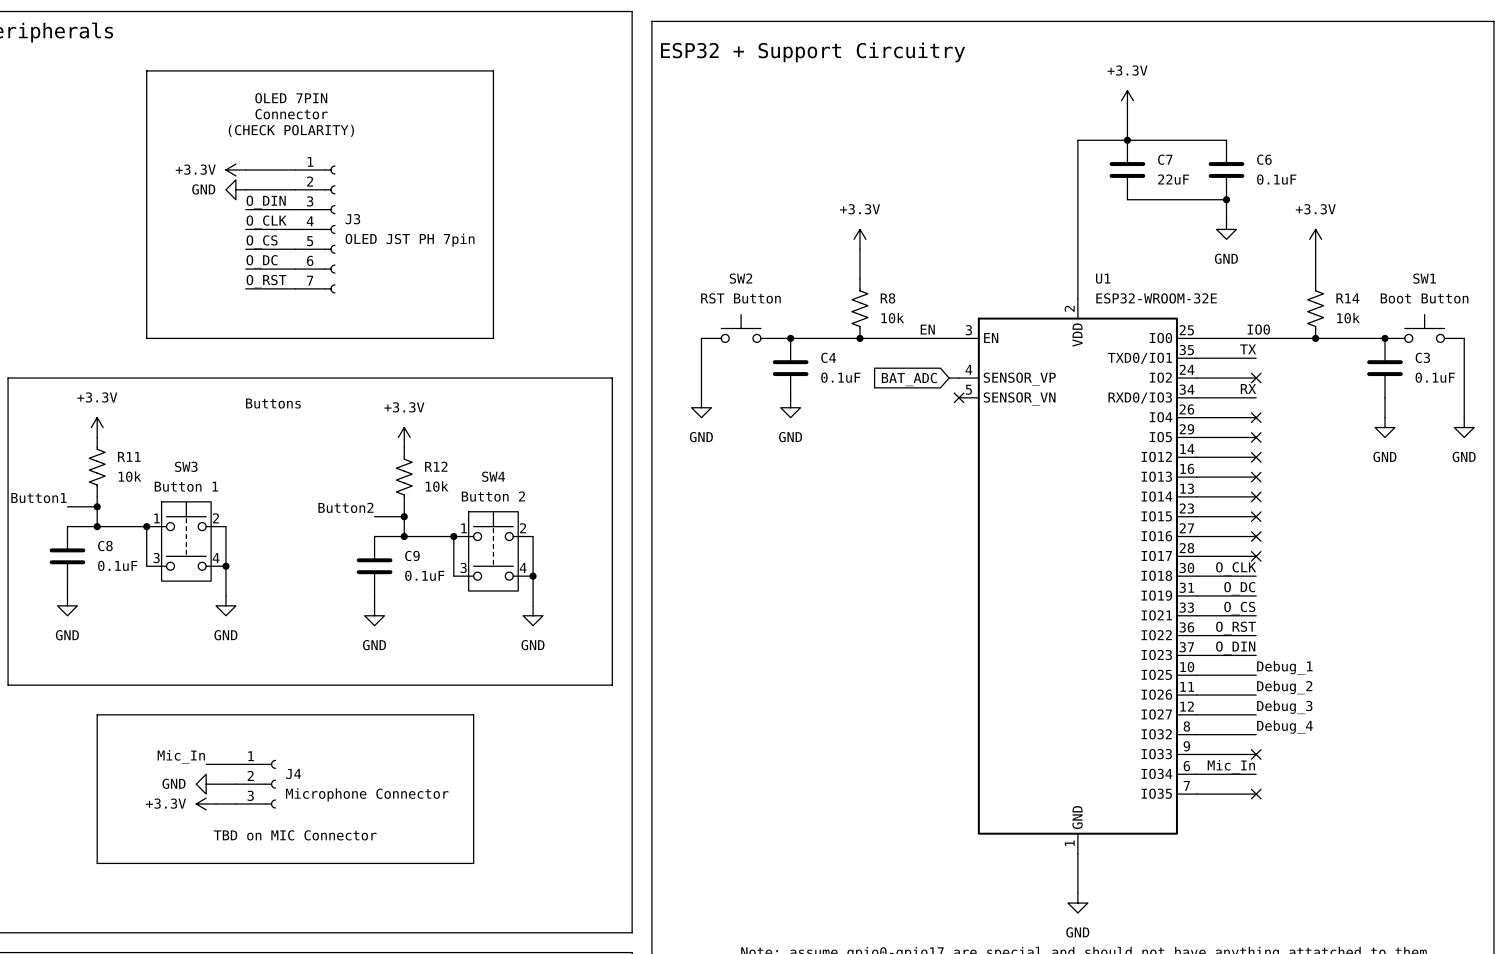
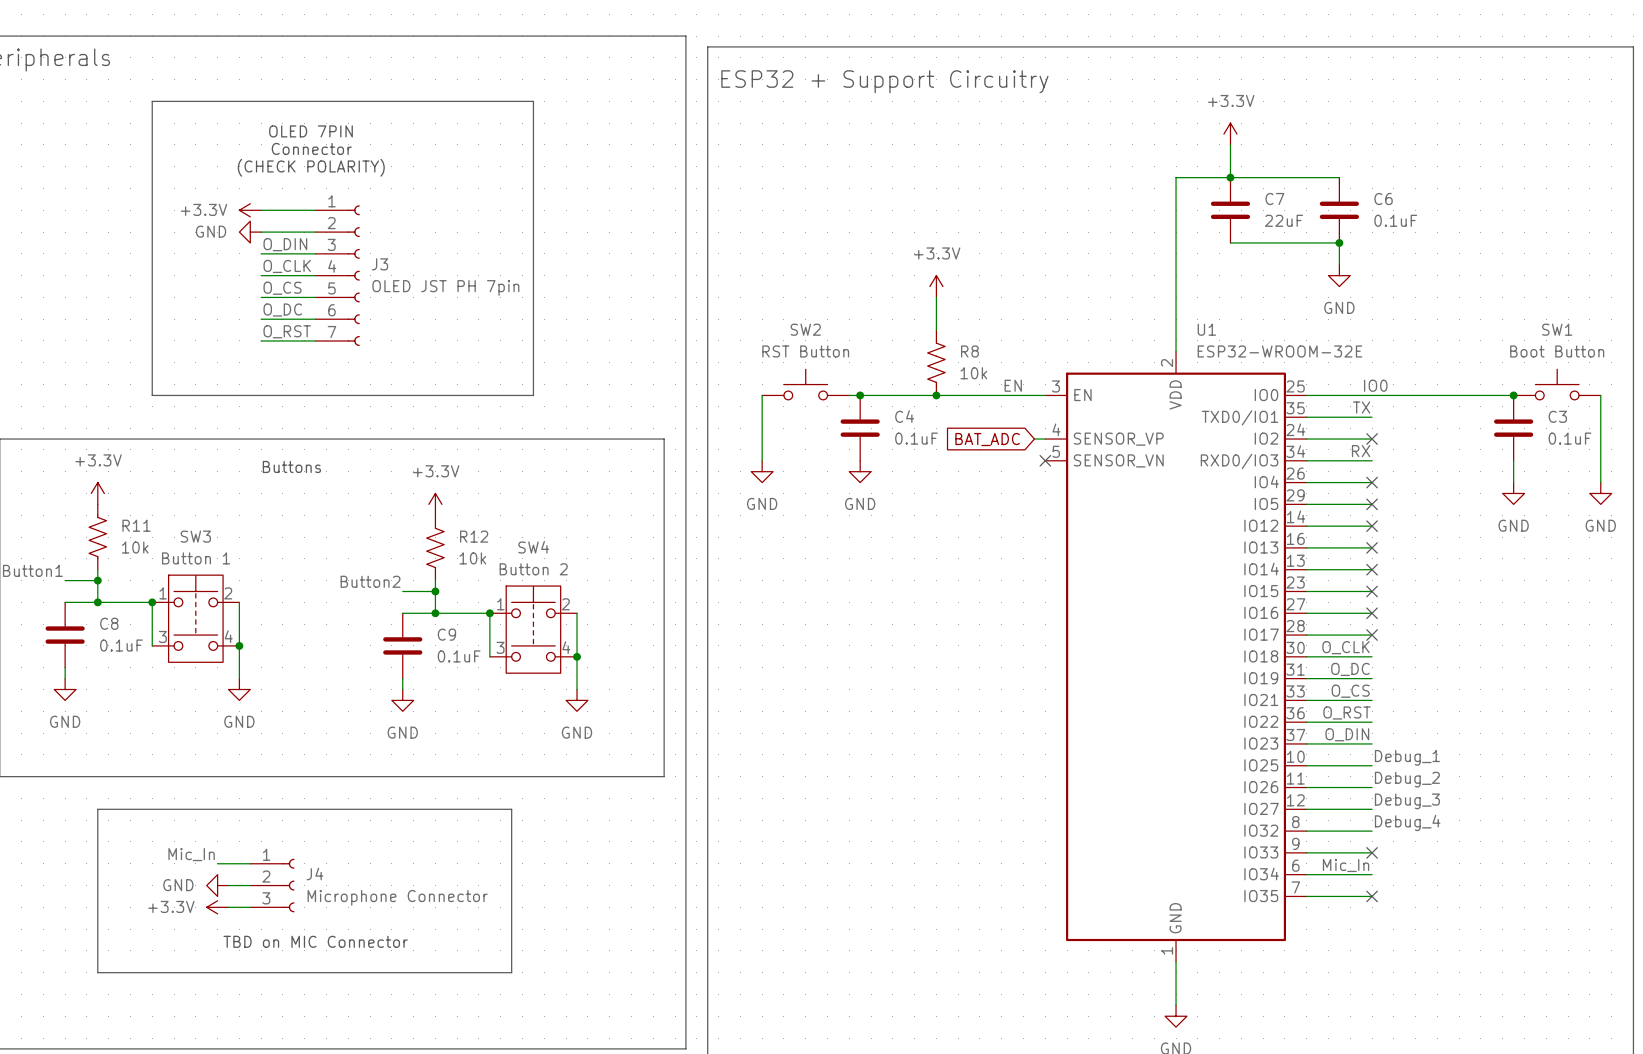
power symbol: +3.3V (1315, 239) -> none
wire: (1315, 249) (1315, 278) -> none
R14: 10k (1315, 308) -> none
junction: (1315, 338) -> none

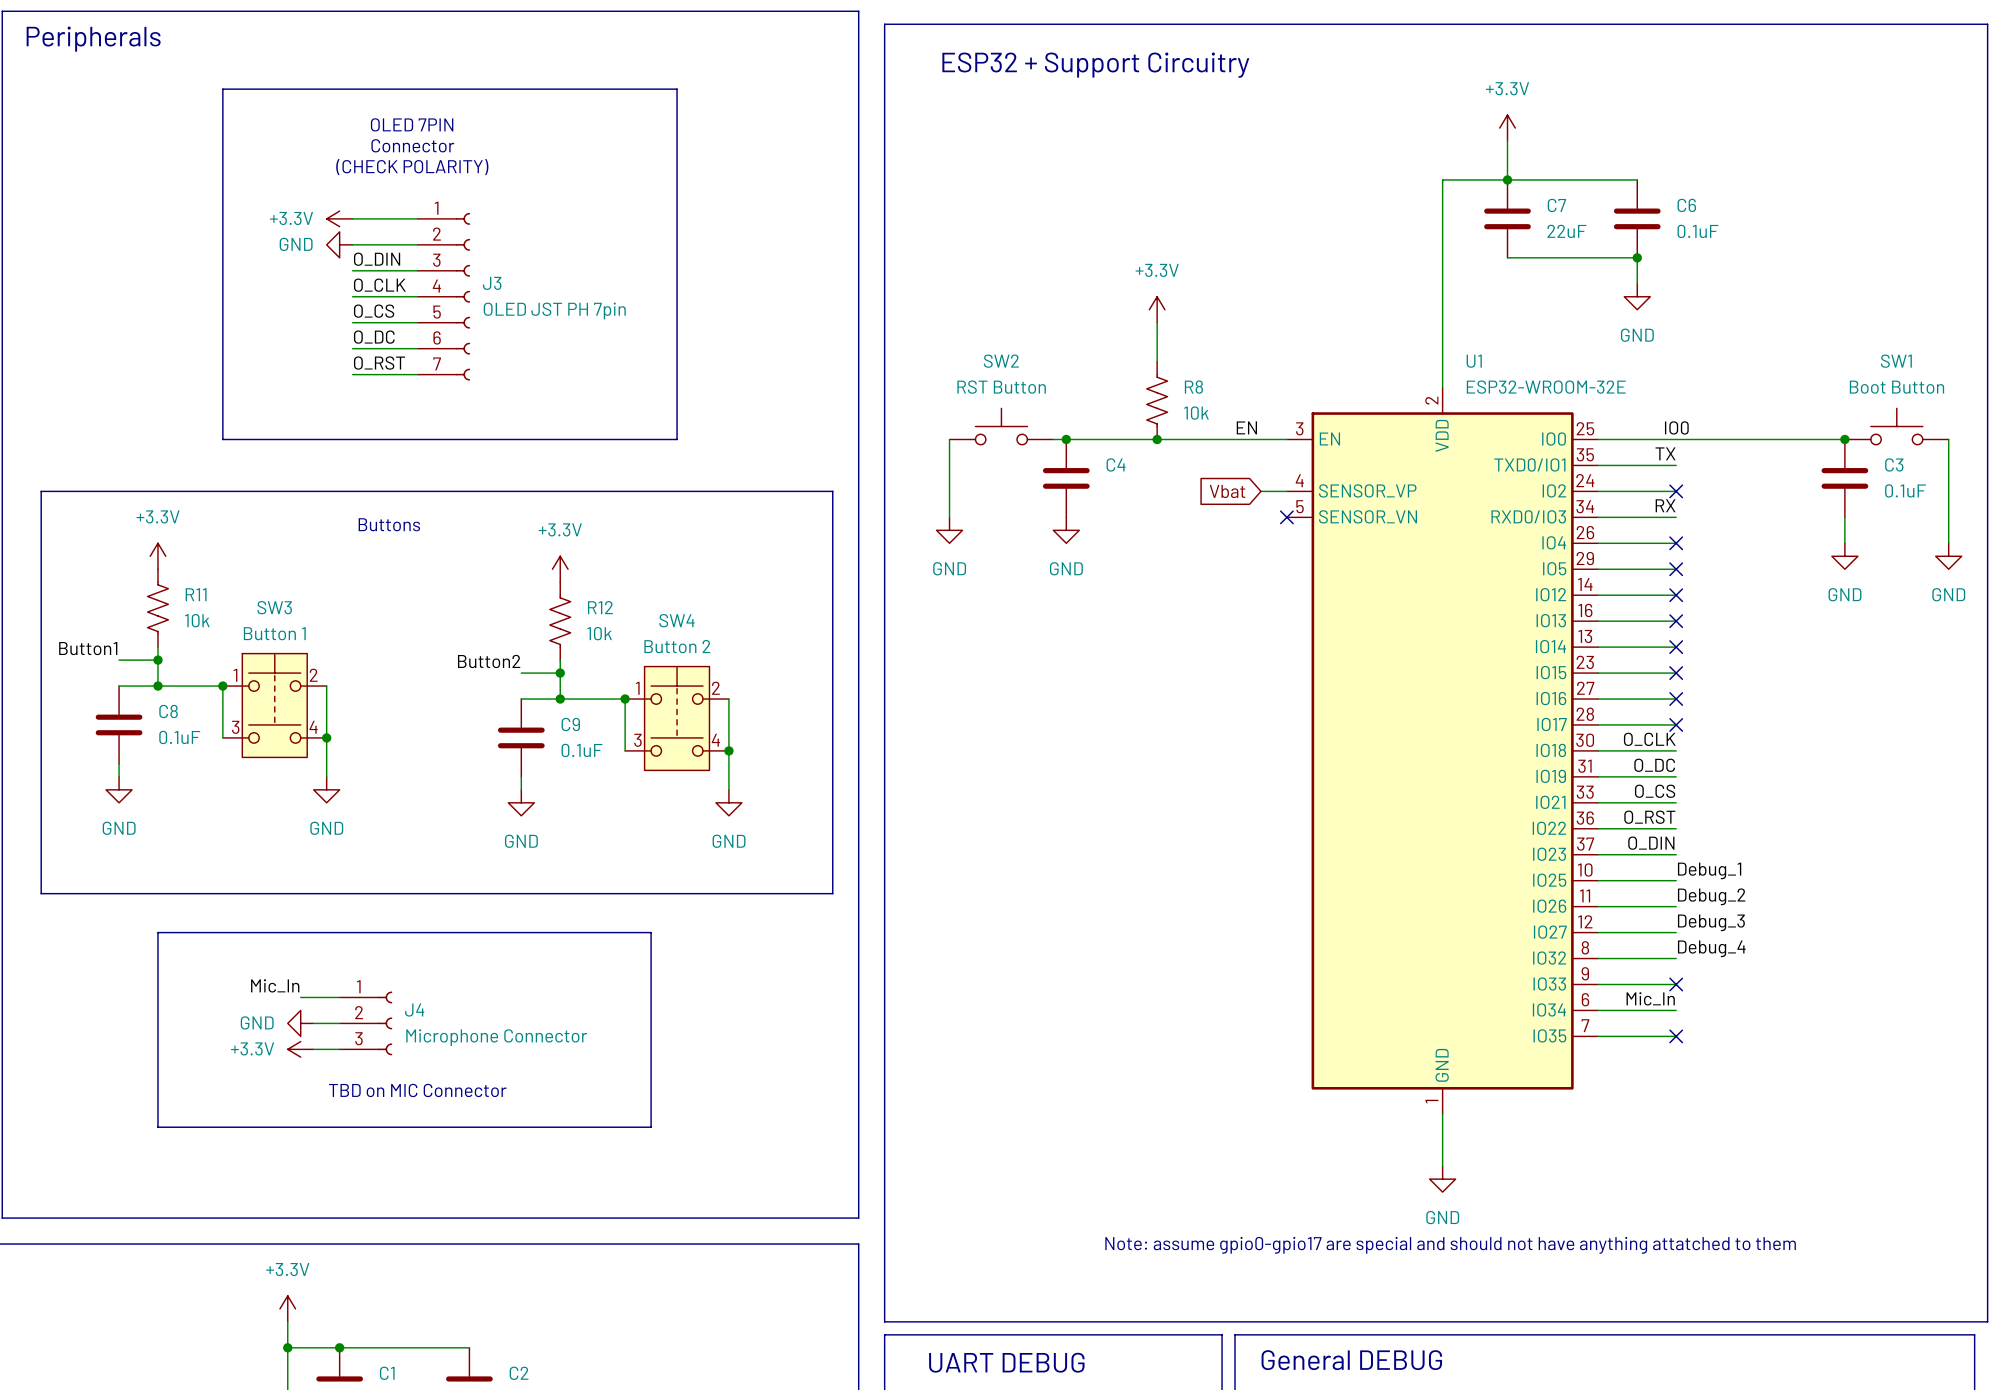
C4 value: 0.1uF (916, 438) -> none
global label: BAT_ADC (987, 439) -> none
global label: none -> Vbat (1227, 491)
wire: none -> (1260, 491) (1273, 491)

